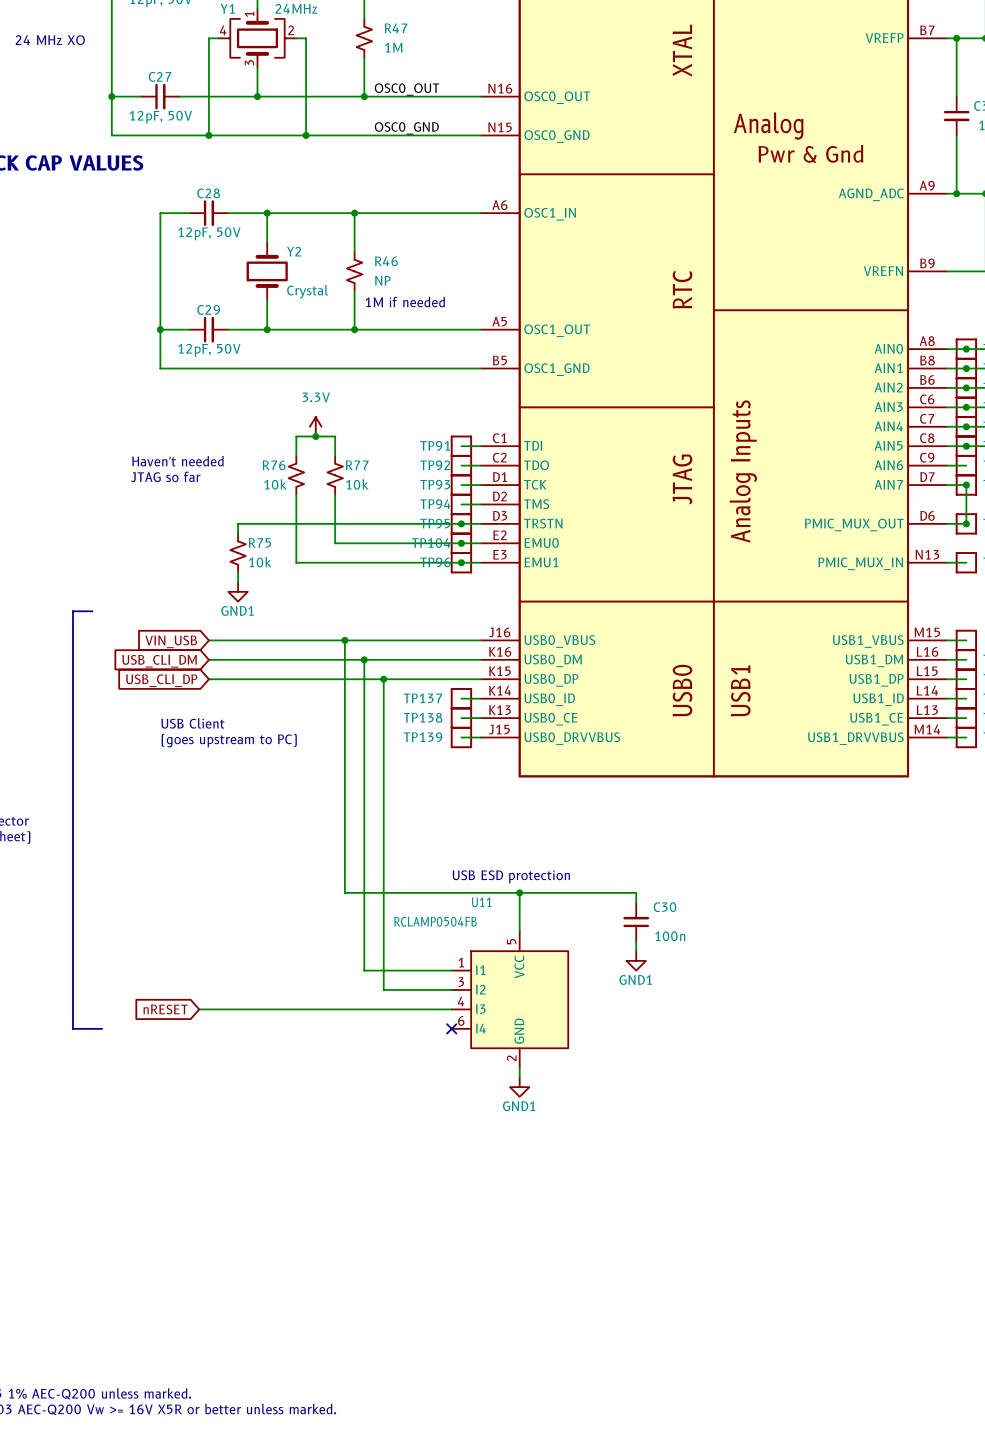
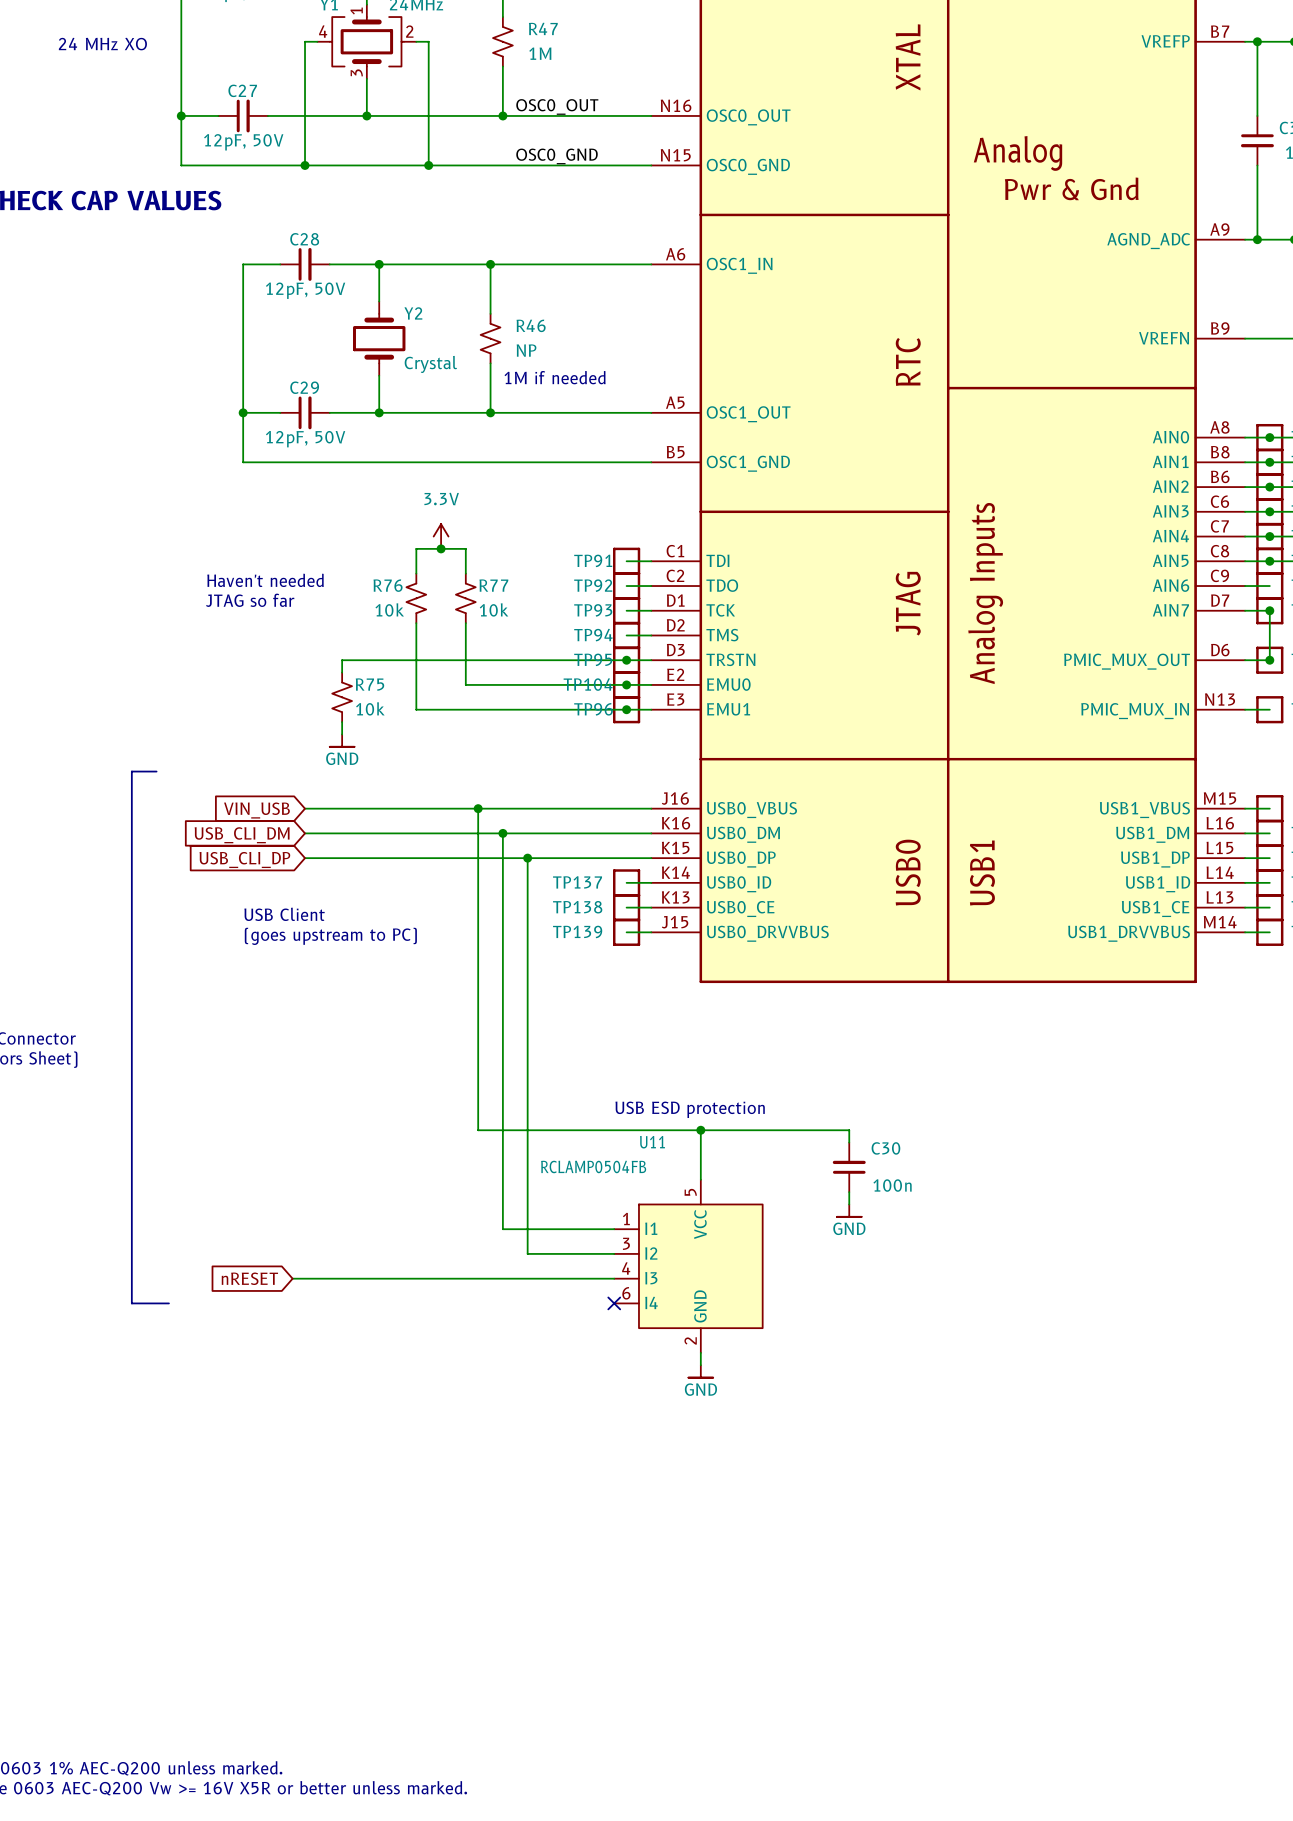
power symbol: GND1 (238, 591) -> GND (342, 740)
power symbol: GND1 (636, 960) -> GND (849, 1210)
power symbol: GND1 (519, 1087) -> GND (700, 1371)

